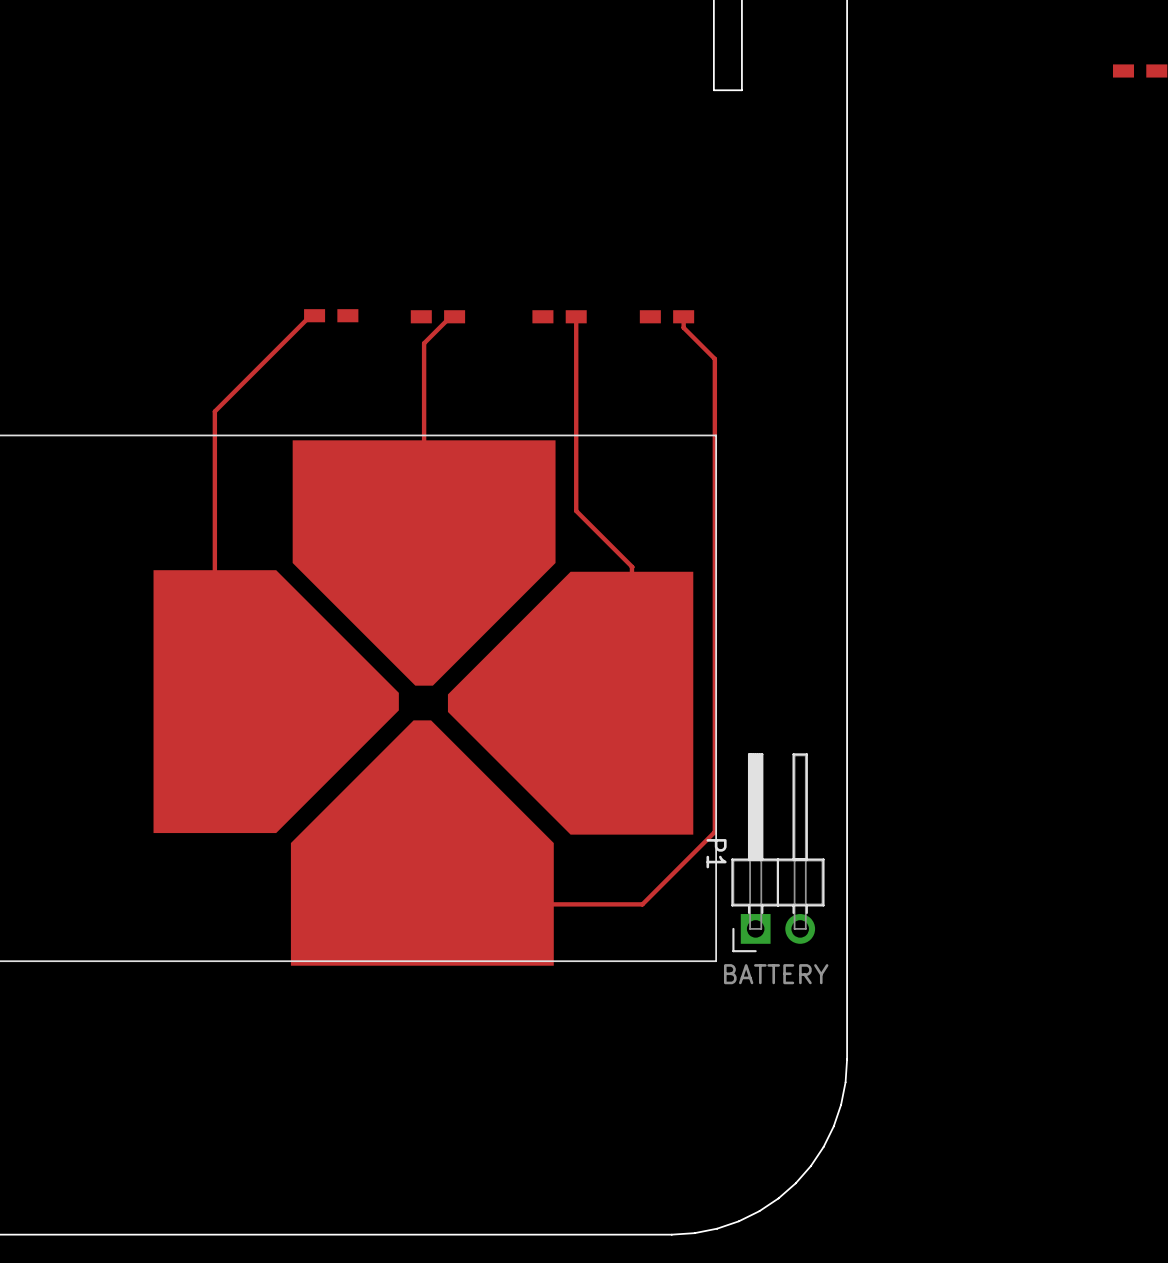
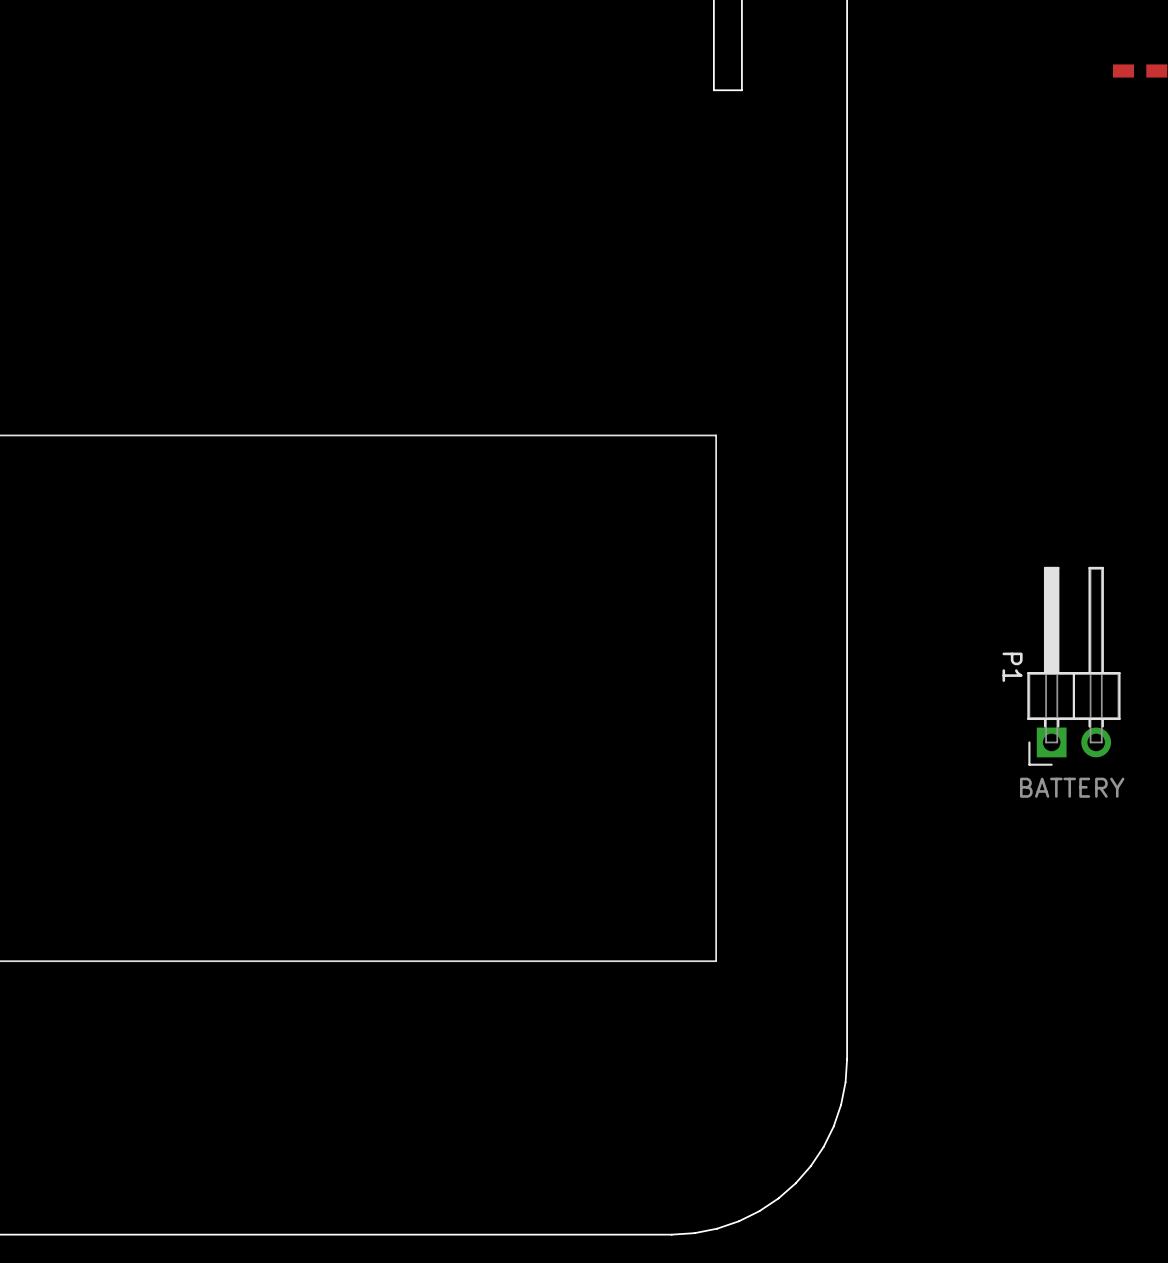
top track: (314, 315) (310, 315) (214, 411) (214, 701) -> none
part: (331, 315) -> none
part: (437, 316) -> none
top track: (454, 316) (450, 316) (424, 343) (424, 501) -> none
part: (559, 316) -> none
top track: (576, 316) (576, 510) (632, 567) (631, 703) -> none
part: (667, 316) -> none
top track: (683, 316) (683, 327) (714, 358) (714, 832) (642, 904) (422, 904) -> none
part: (424, 562) -> none
part: (276, 701) -> none
part: (570, 703) -> none
part: (422, 843) -> none
P1 position: (777, 852) -> (1073, 666)

